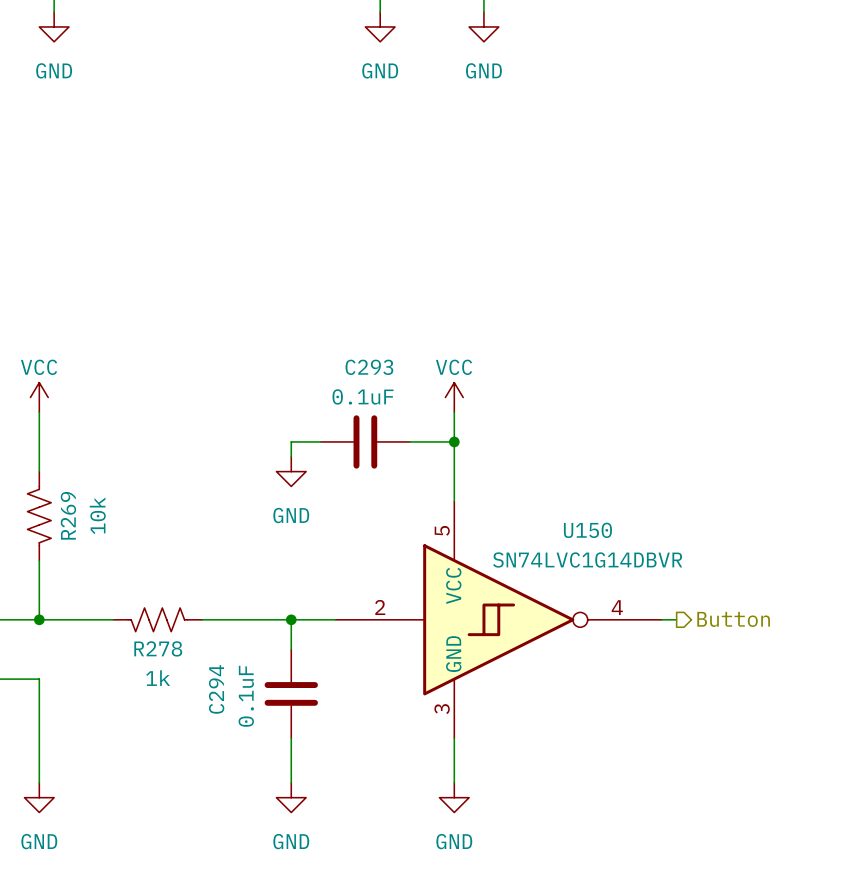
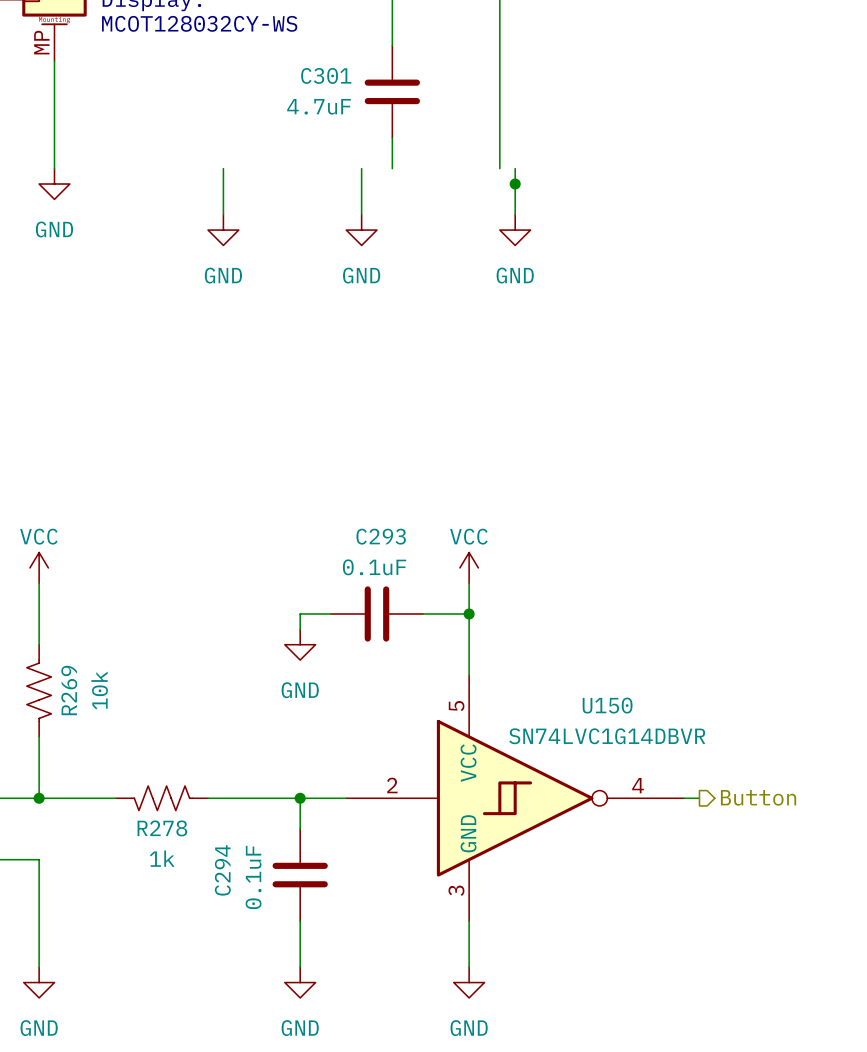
wire: none -> (223, 168) (223, 214)
wire: none -> (361, 168) (361, 214)
wire: none -> (515, 168) (515, 214)
power symbol position: GND (380, 26) -> GND (361, 230)
power symbol position: GND (483, 26) -> GND (515, 230)
junction: none -> (515, 184)
power symbol: none -> GND (223, 230)

